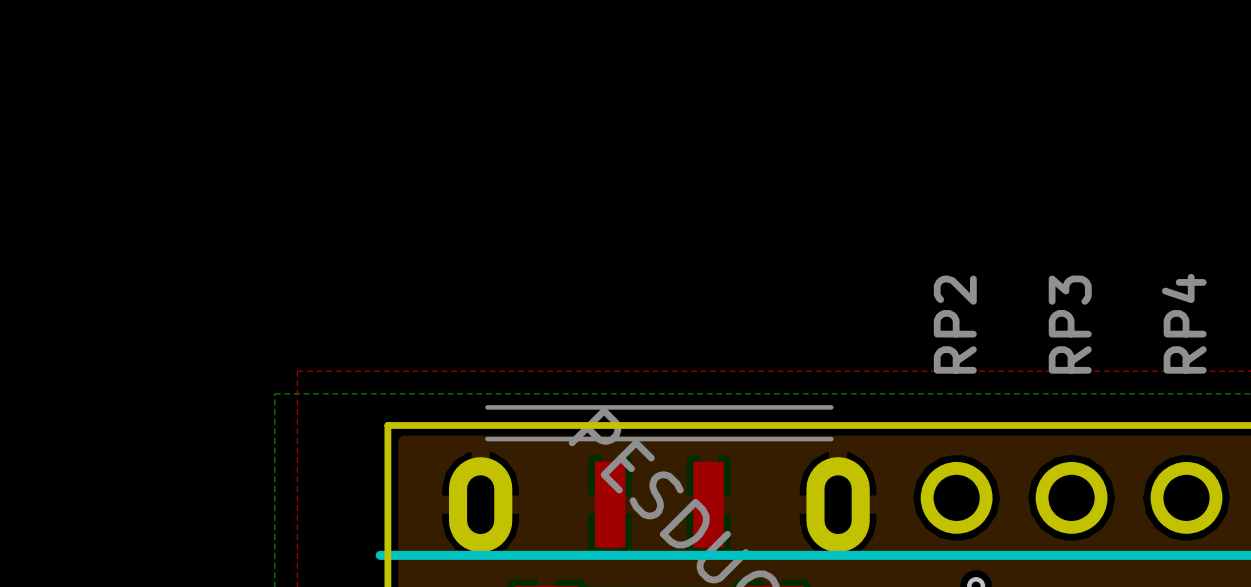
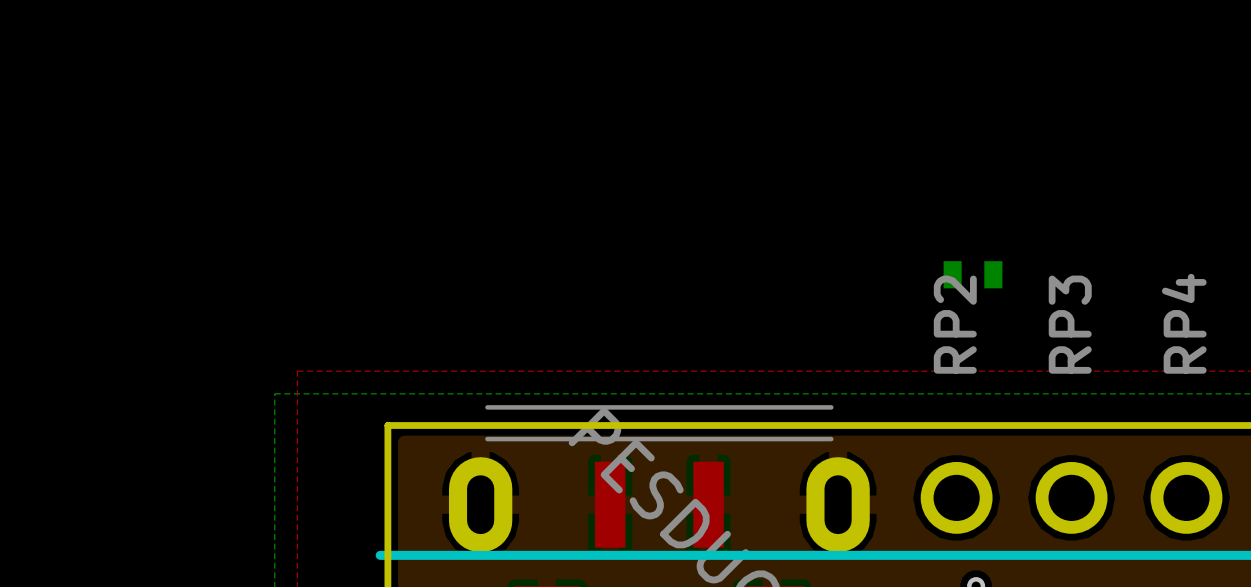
part: none -> (972, 274)

